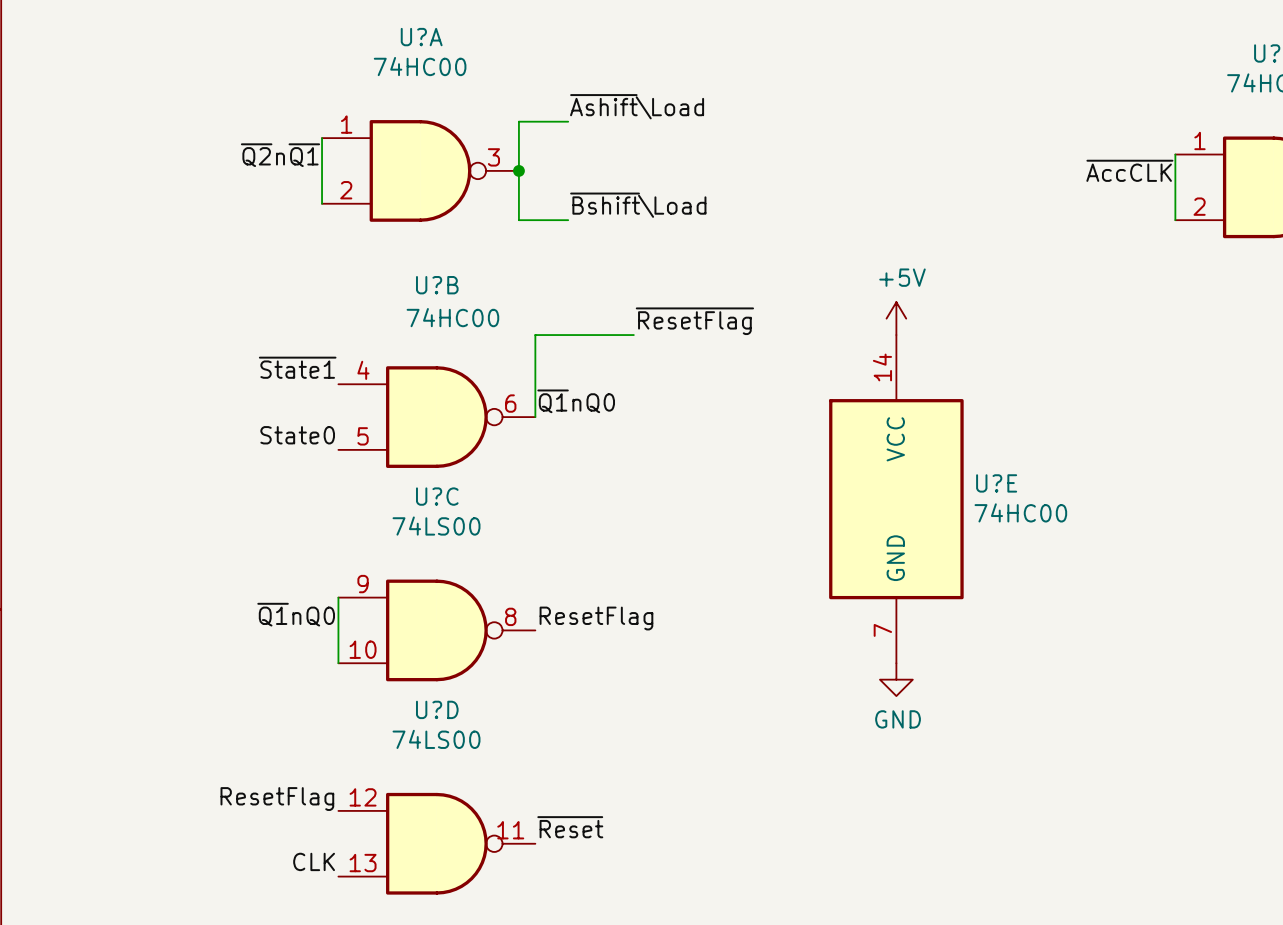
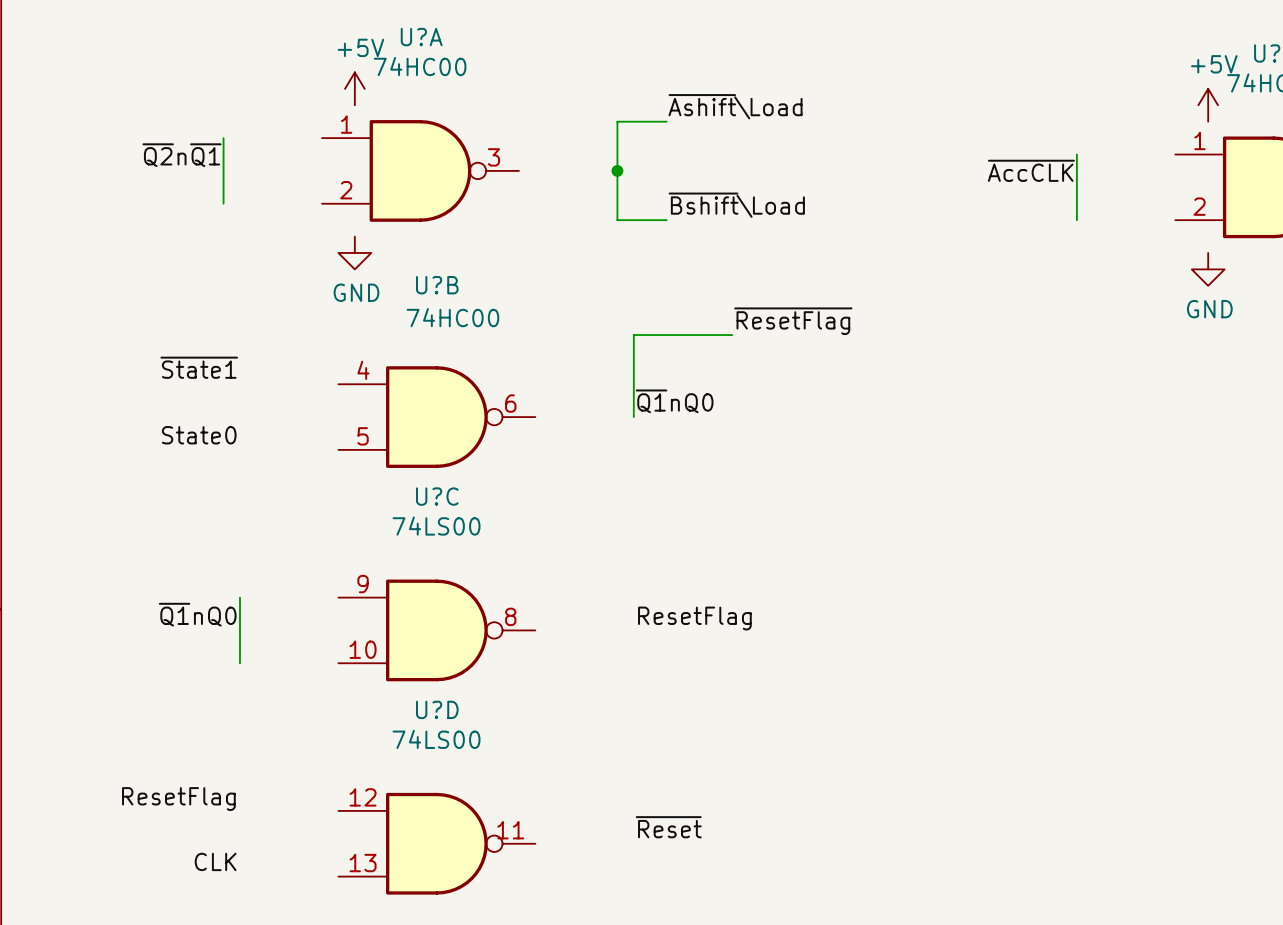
power symbol: none -> +5V (354, 88)
power symbol: none -> +5V (1208, 105)
label position: ~{Ashift}\Load (637, 106) -> ~{Ashift}\Load (735, 106)
wire: (568, 121) (518, 121) (518, 220) (568, 220) -> (666, 121) (617, 121) (617, 220) (666, 220)
wire: (322, 138) (322, 203) -> (223, 138) (223, 203)
wire: (1175, 154) (1175, 220) -> (1076, 154) (1076, 220)
label position: ~{Q2}n~{Q1} (280, 155) -> ~{Q2}n~{Q1} (182, 155)
junction: (518, 170) -> none
junction: none -> (617, 170)
label position: ~{AccCLK} (1129, 170) -> ~{AccCLK} (1031, 170)
label position: ~{Bshift}\Load (638, 205) -> ~{Bshift}\Load (736, 205)
power symbol: none -> GND (354, 252)
power symbol: none -> GND (1208, 269)
power symbol: +5V (896, 318) -> none
label position: ~{ResetFlag} (694, 321) -> ~{ResetFlag} (793, 321)
wire: (633, 335) (535, 335) (535, 417) -> (732, 335) (633, 335) (633, 417)
label position: ~{State1} (297, 367) -> ~{State1} (199, 367)
label position: ~{Q1}nQ0 (576, 401) -> ~{Q1}nQ0 (674, 401)
label position: State0 (297, 435) -> State0 (199, 435)
U?E: 74HC00 (896, 499) -> none
wire: (338, 597) (338, 663) -> (239, 597) (239, 663)
label position: ~{Q1}nQ0 (296, 614) -> ~{Q1}nQ0 (197, 614)
label position: ResetFlag (596, 618) -> ResetFlag (694, 618)
power symbol: GND (896, 679) -> none
label position: ResetFlag (277, 799) -> ResetFlag (178, 799)
label position: ~{Reset} (570, 827) -> ~{Reset} (668, 827)
label position: CLK (314, 861) -> CLK (215, 861)

